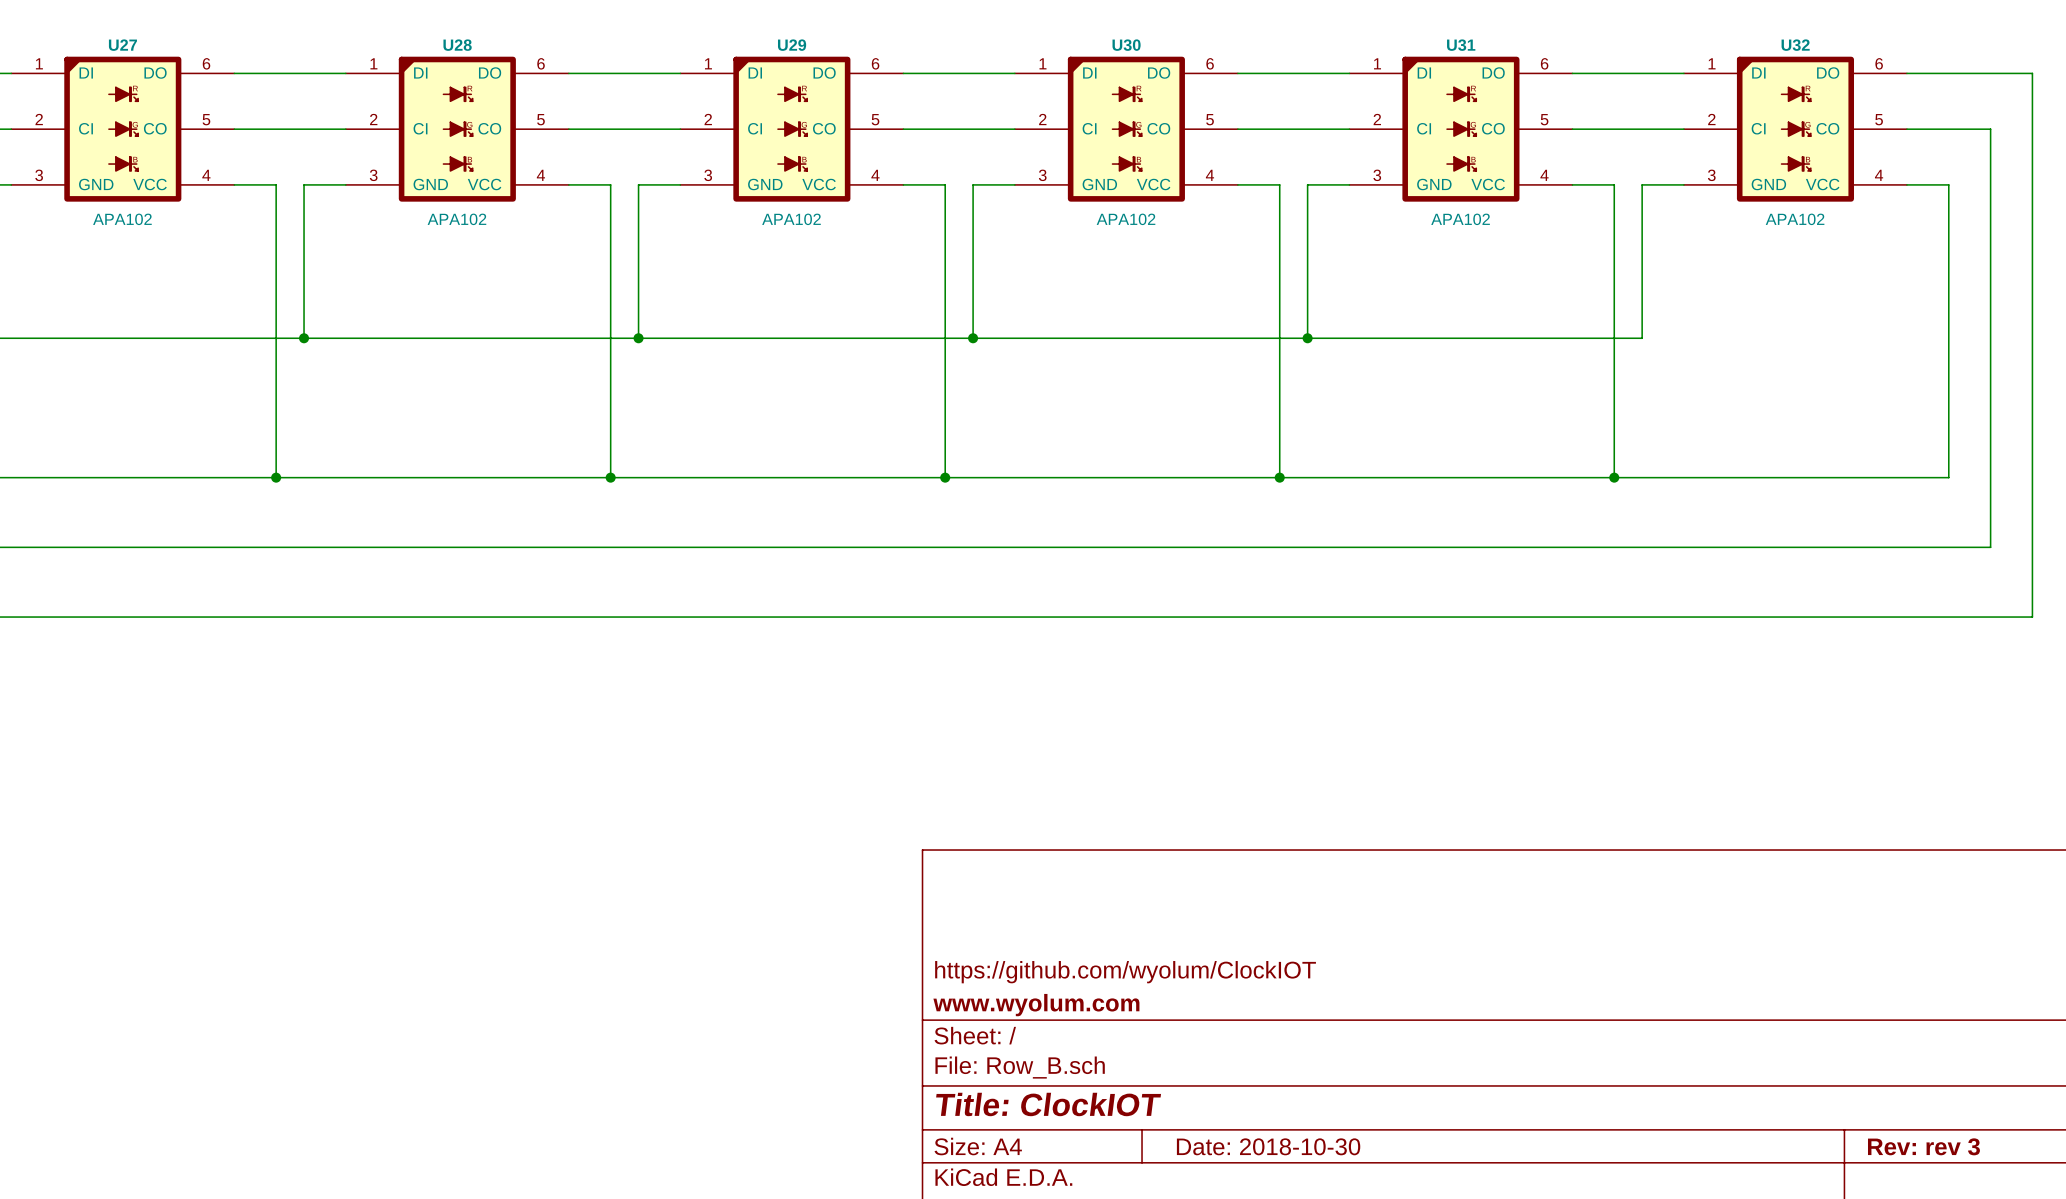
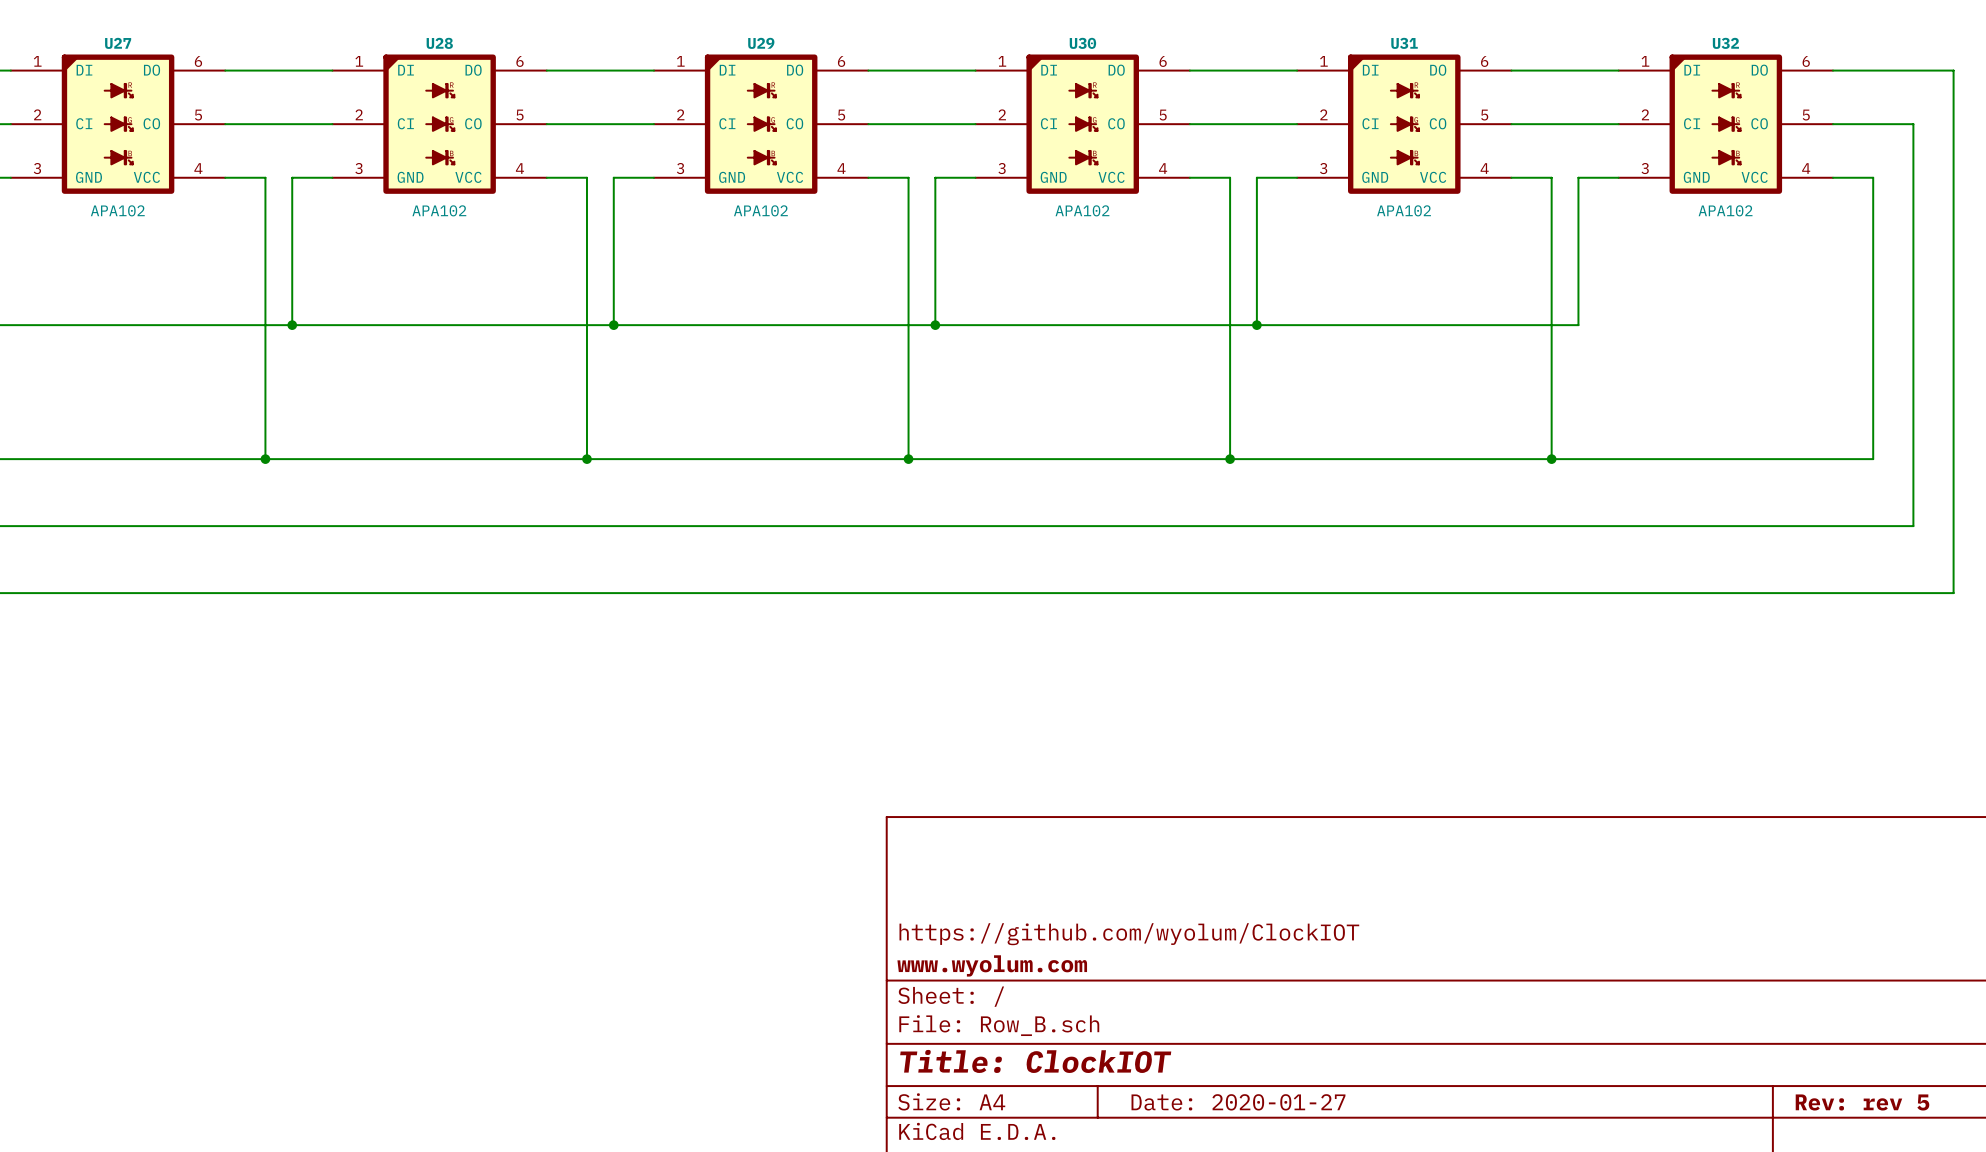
title block: Date: 2018-10-30 (1268, 1146) -> Date: 2020-01-27 (1238, 1102)
title block: Rev: rev 3 (1923, 1146) -> Rev: rev 5 (1862, 1102)

